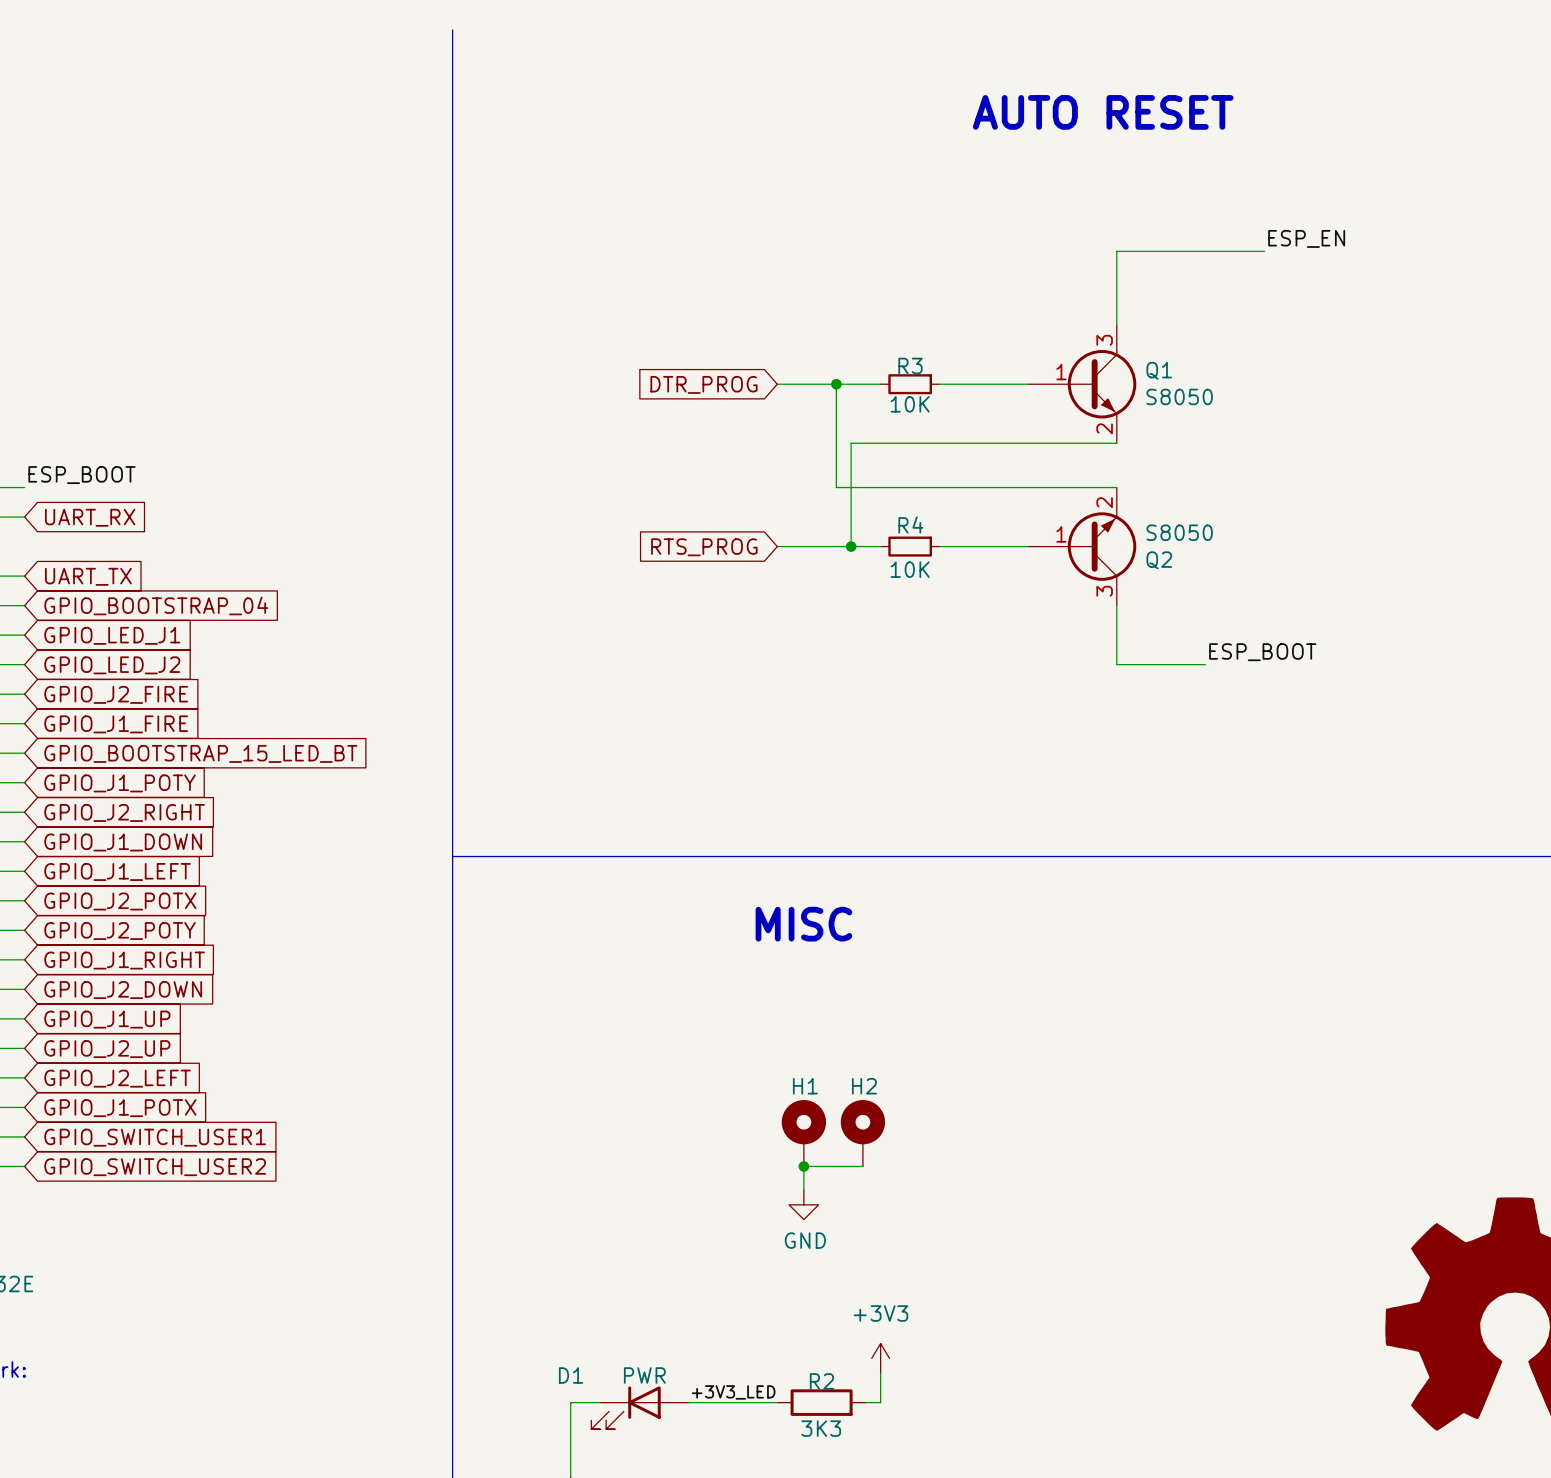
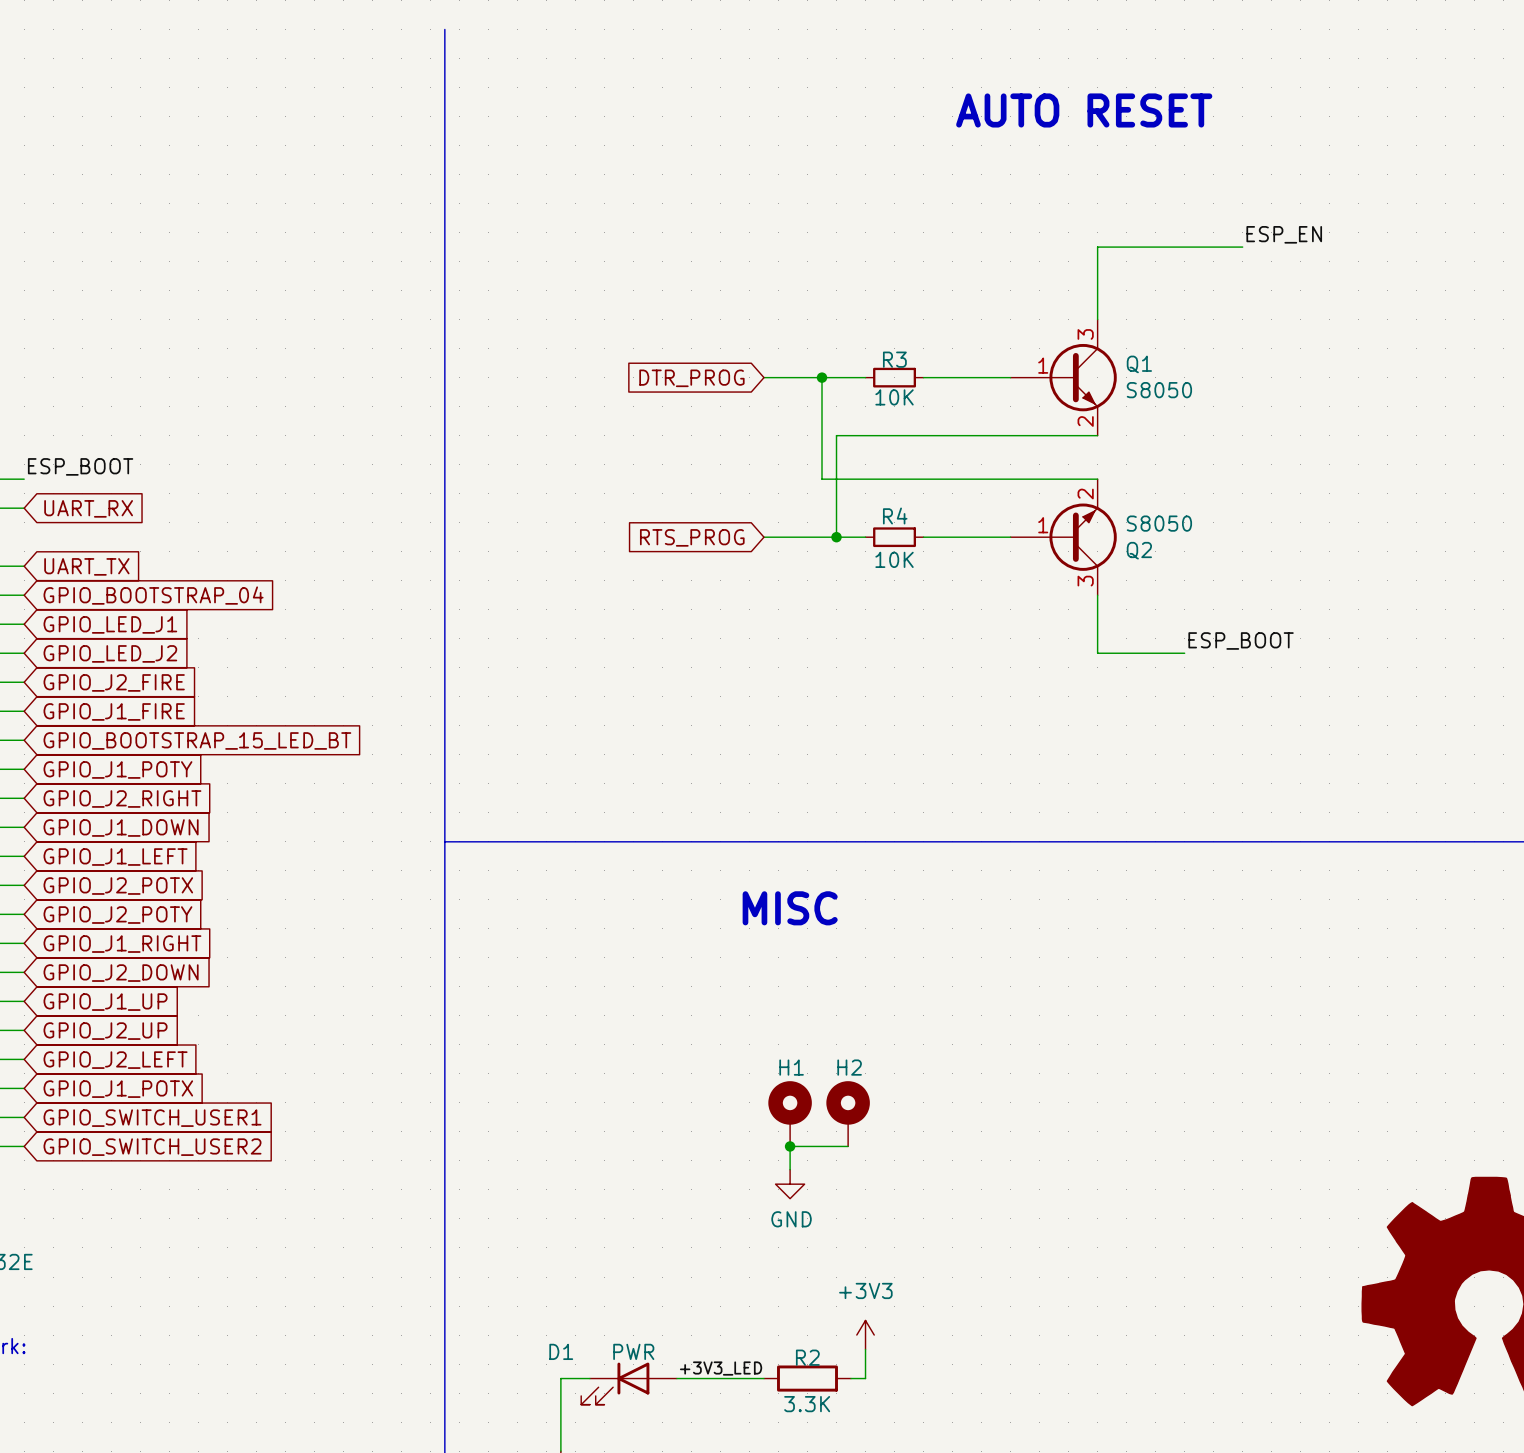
R2 value: 3K3 (821, 1428) -> 3.3K (807, 1404)

